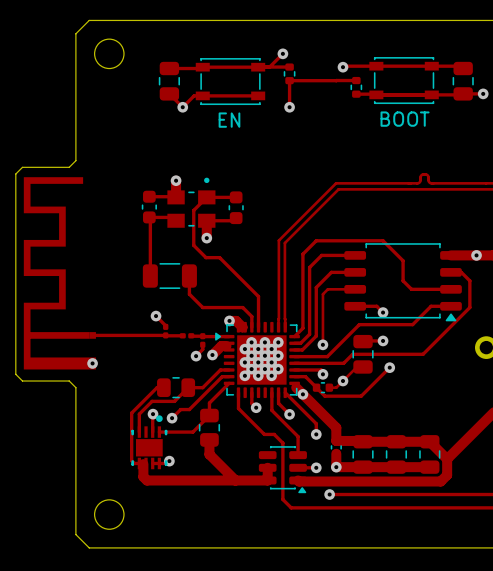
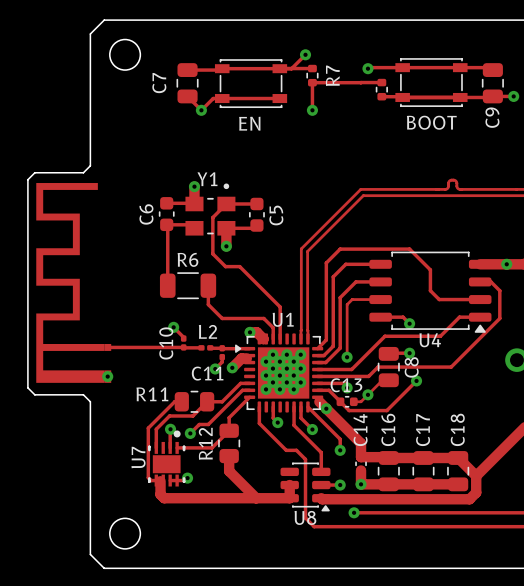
R7 name: none -> R7 (332, 75)
C7 name: none -> C7 (159, 83)
C9 name: none -> C9 (492, 117)
Y1 name: none -> Y1 (207, 179)
C6 name: none -> C6 (146, 214)
C5 name: none -> C5 (276, 215)
R6 name: none -> R6 (187, 259)
U1 name: none -> U1 (283, 319)
L2 name: none -> L2 (207, 331)
U4 name: none -> U4 (430, 340)
C10 name: none -> C10 (166, 343)
C8 name: none -> C8 (411, 367)
C11 name: none -> C11 (207, 373)
C13 name: none -> C13 (346, 385)
R11 name: none -> R11 (152, 394)
C14 name: none -> C14 (360, 430)
C16 name: none -> C16 (388, 429)
C17 name: none -> C17 (423, 430)
C18 name: none -> C18 (457, 429)
R12 name: none -> R12 (205, 443)
U7 name: none -> U7 (138, 457)
U8 name: none -> U8 (305, 517)

